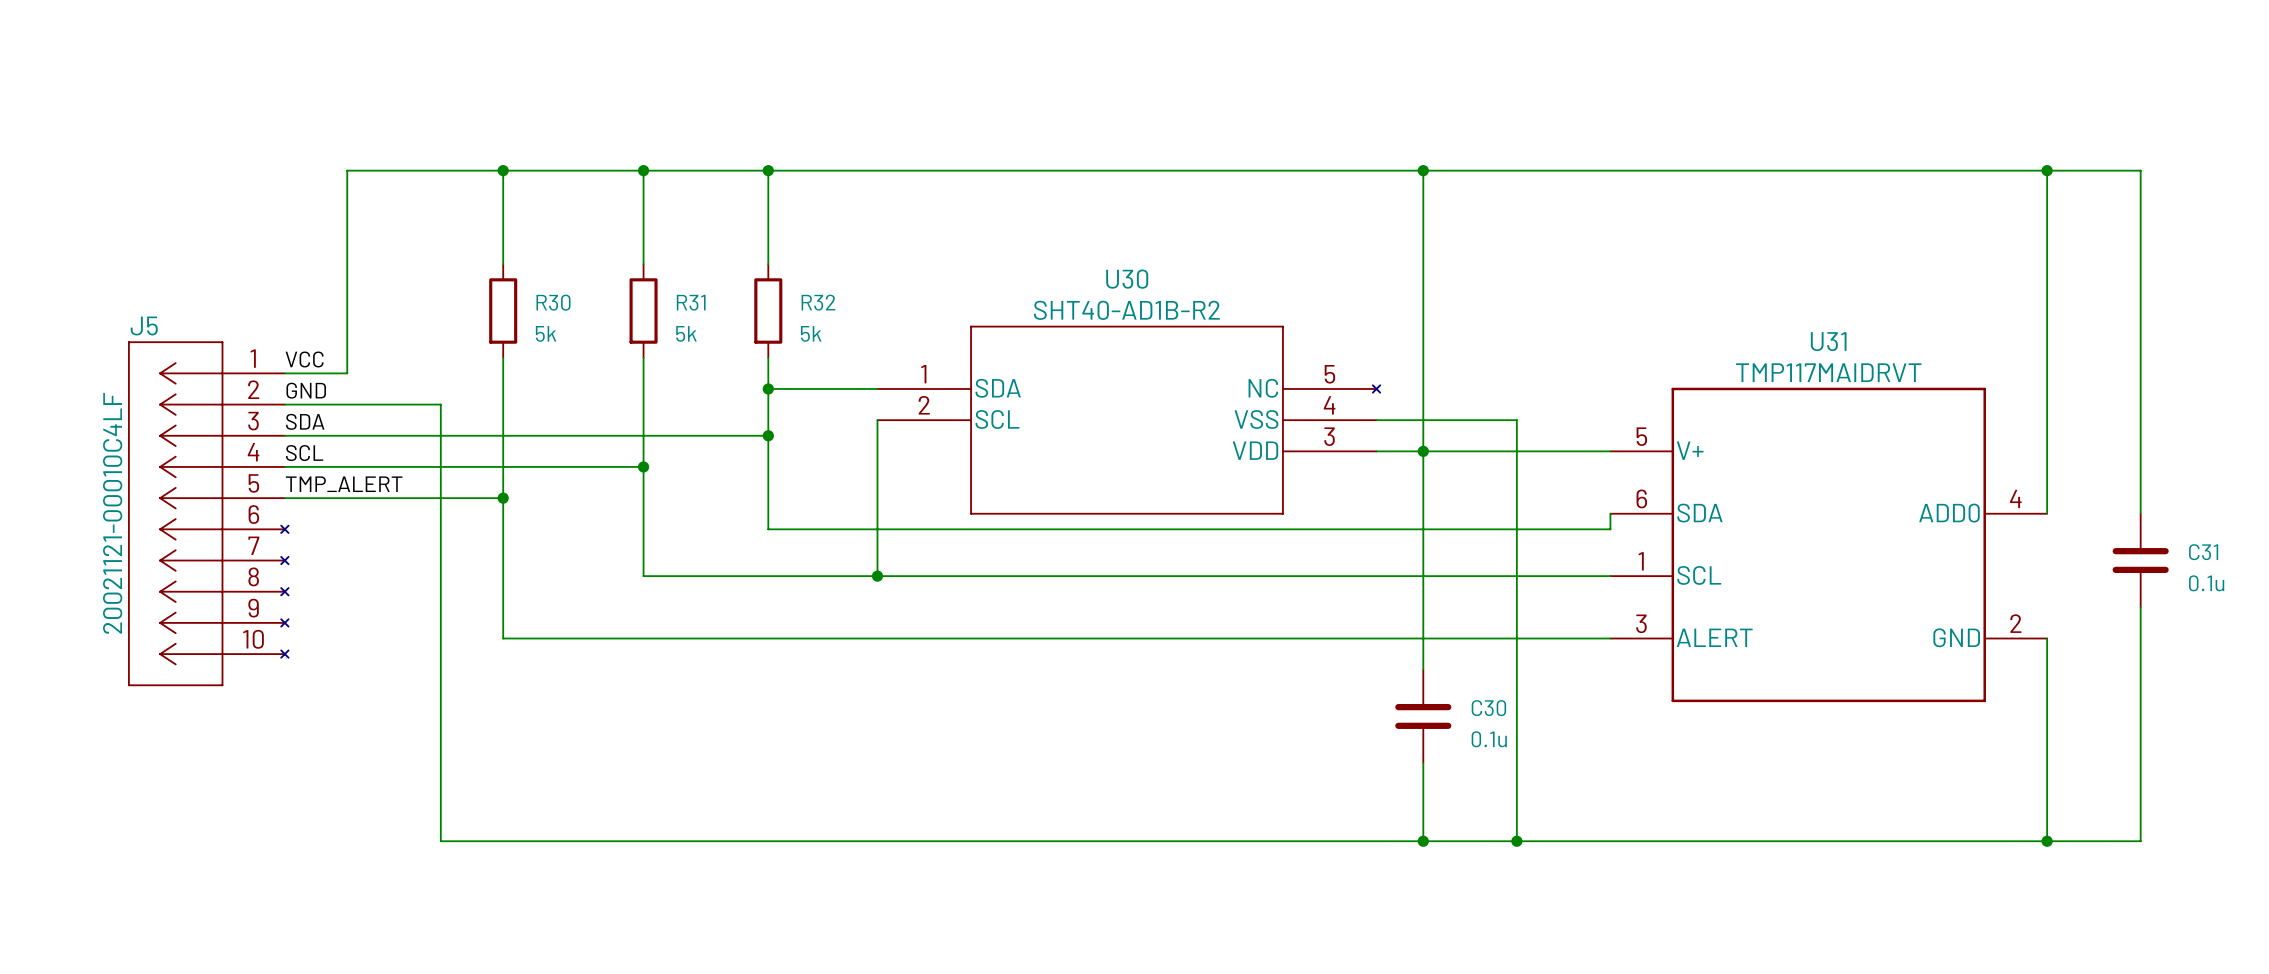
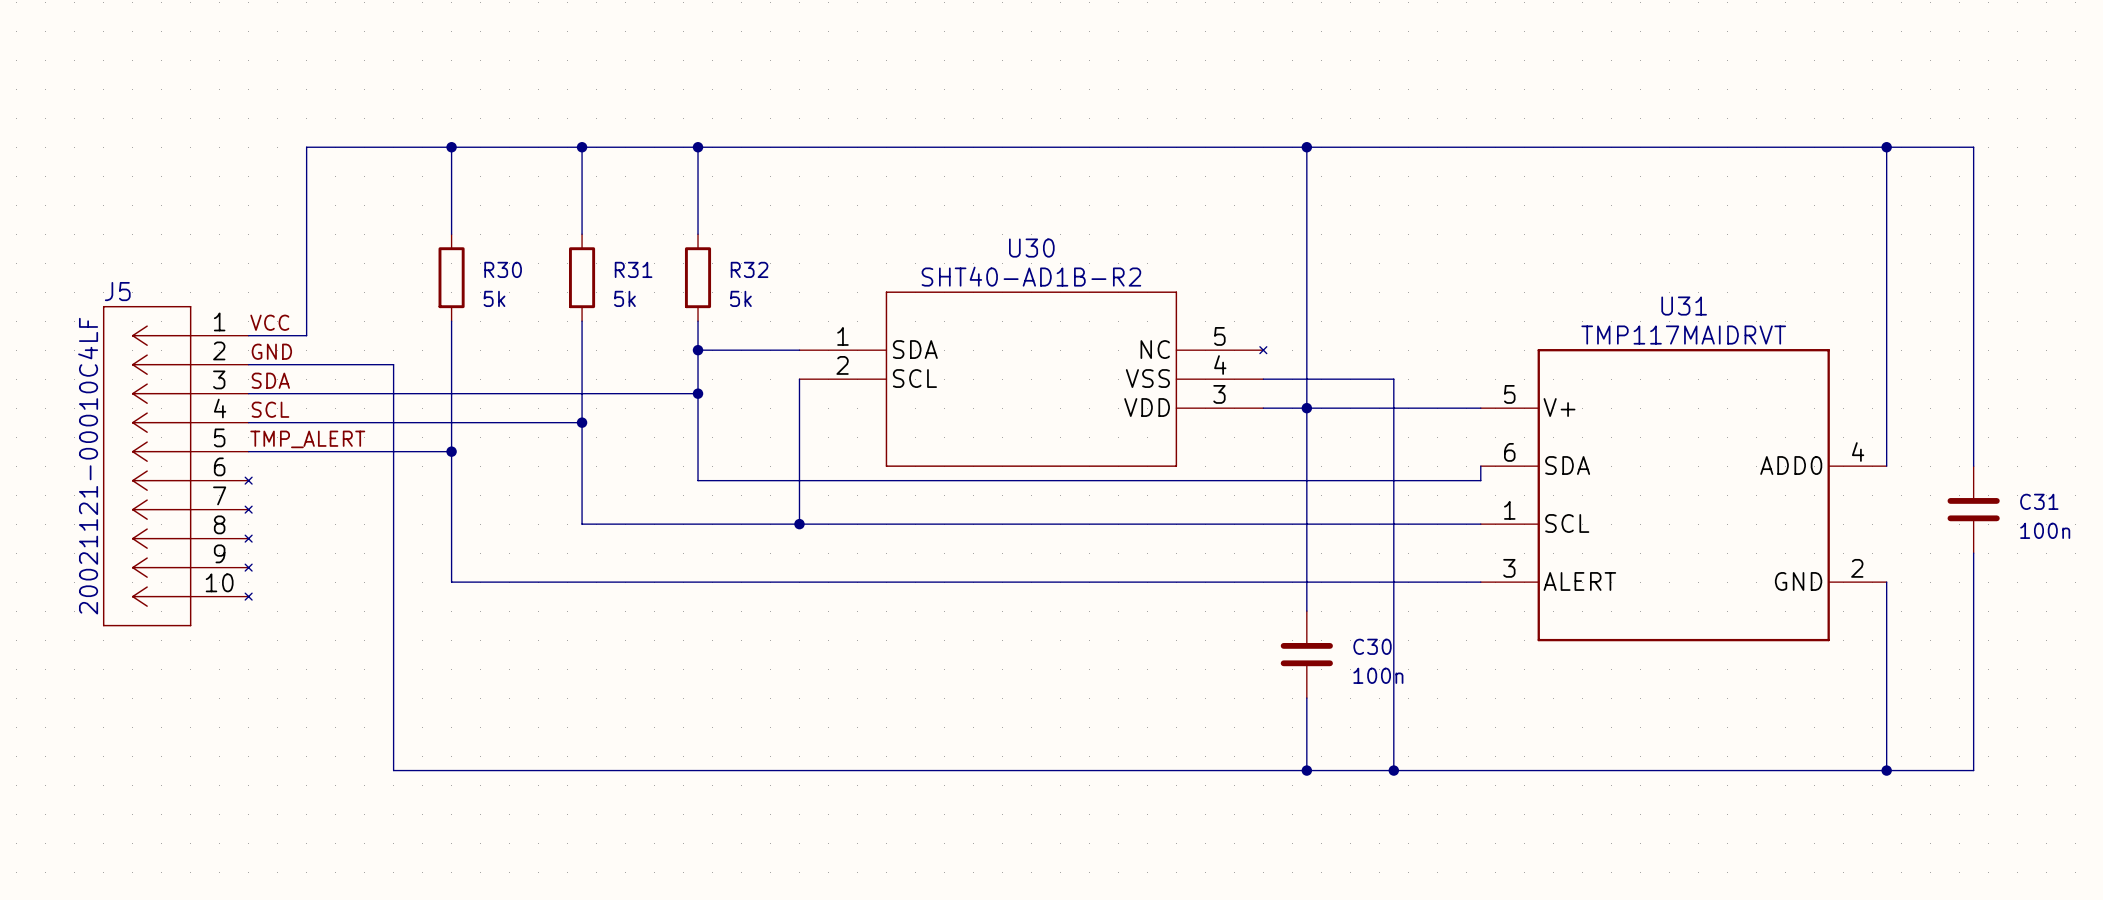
C31 value: 0.1u (2206, 583) -> 100n (2045, 530)
C30 value: 0.1u (1489, 739) -> 100n (1378, 675)

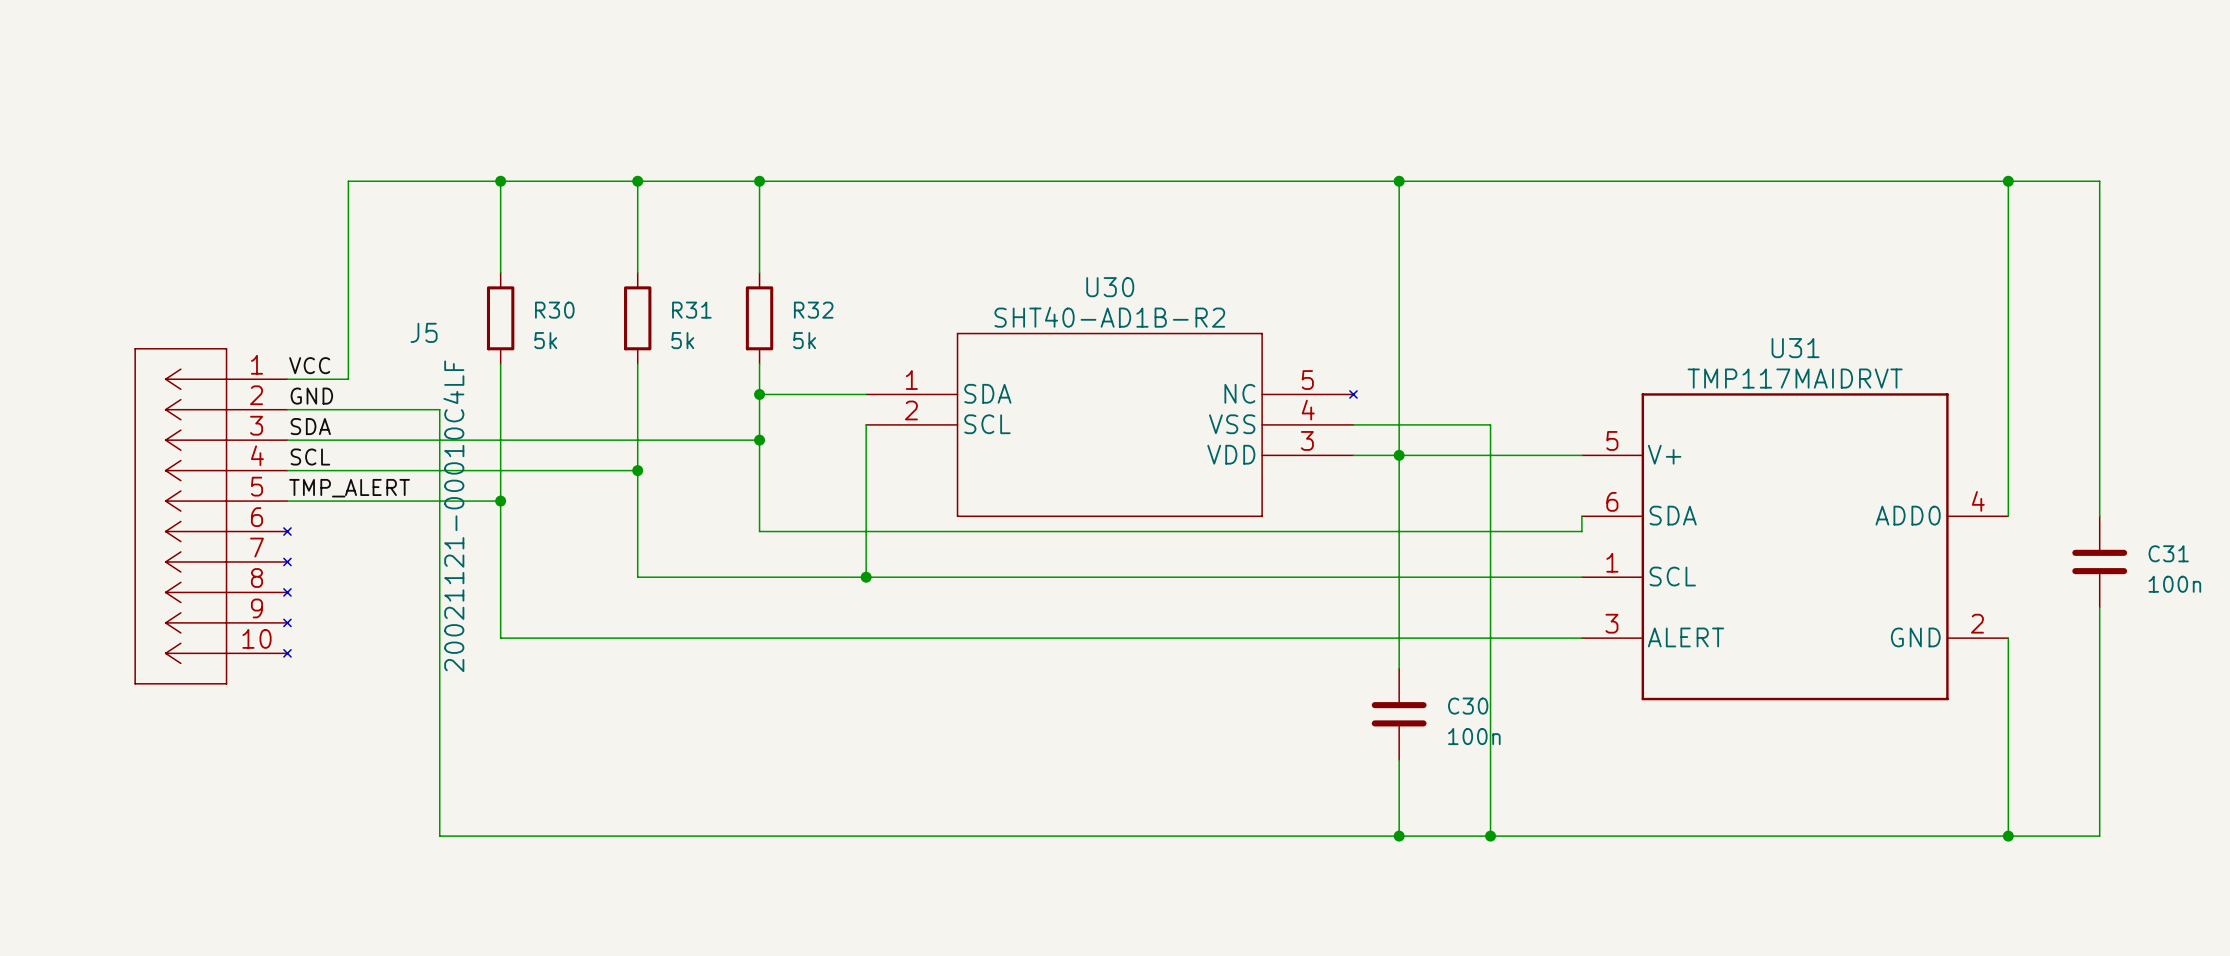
J5 name position: J5 (117, 291) -> J5 (424, 332)
J5 value position: 20021121-00010C4LF (88, 466) -> 20021121-00010C4LF (453, 516)

